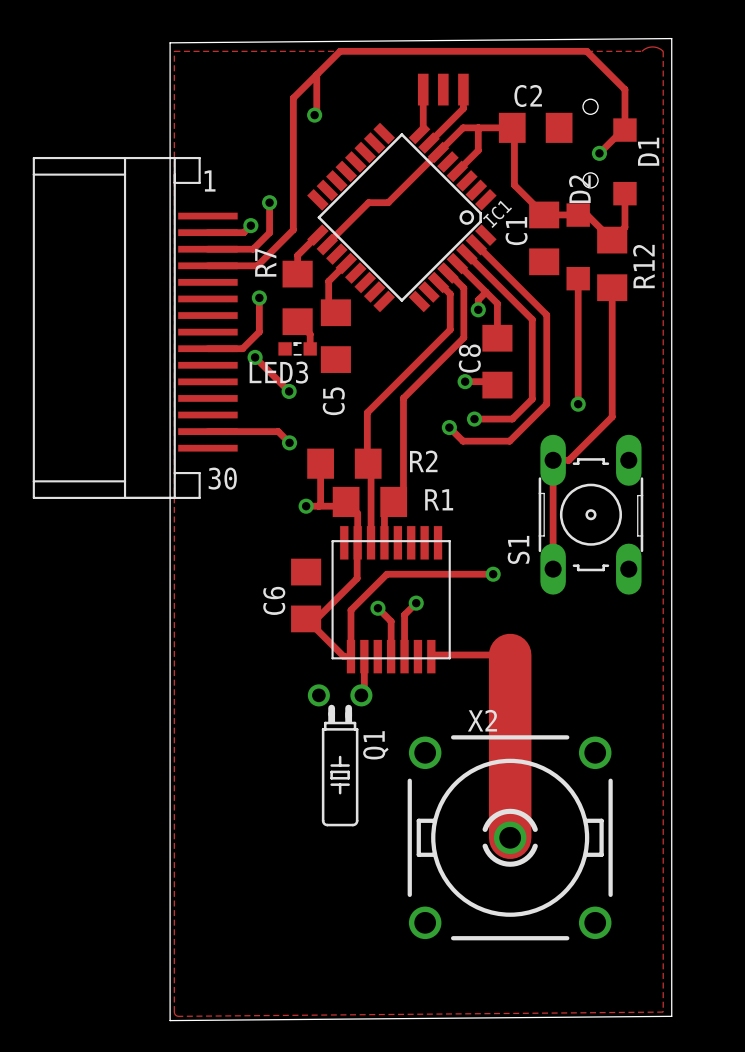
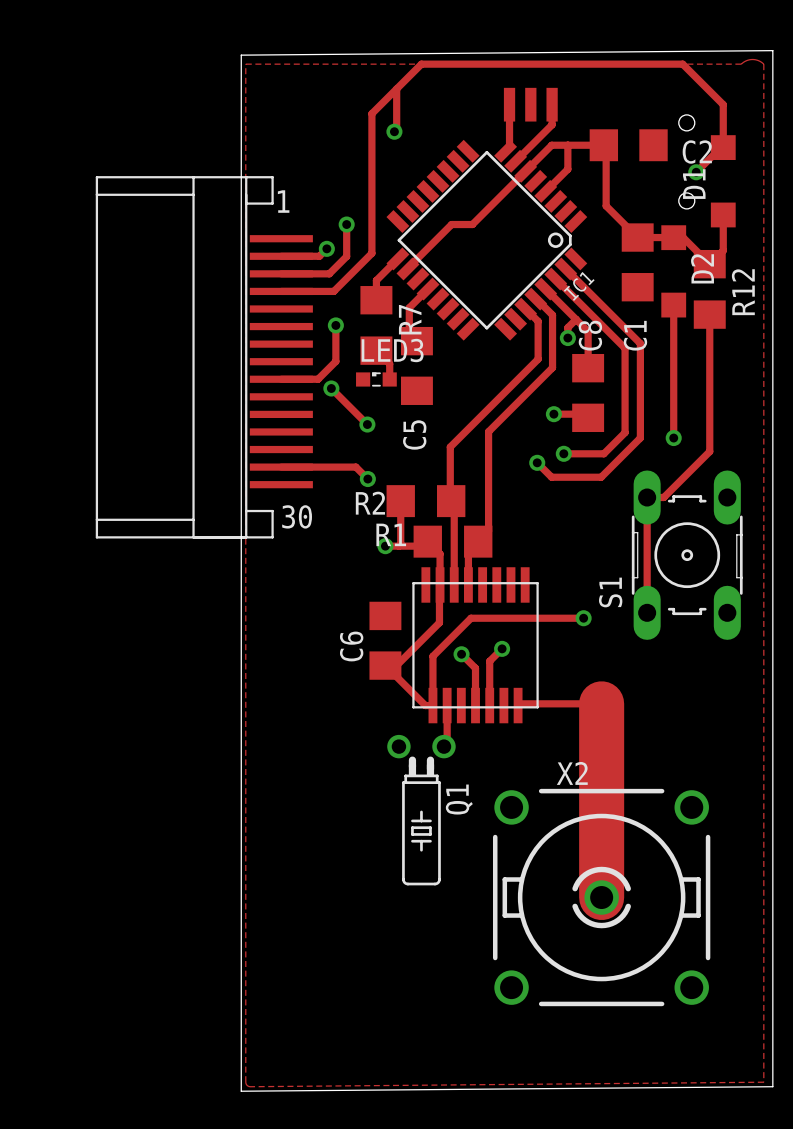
C2 name position: C2 (528, 95) -> C2 (697, 152)
D1 name position: D1 (648, 151) -> D1 (694, 184)
D2 name position: D2 (579, 189) -> D2 (702, 268)
IC1 name position: IC1 (497, 214) -> IC1 (579, 286)
C1 name position: C1 (516, 231) -> C1 (635, 335)
R7 name position: R7 (265, 262) -> R7 (410, 319)
C8 name position: C8 (469, 358) -> C8 (590, 335)
LED3 name position: LED3 (278, 372) -> LED3 (392, 350)
R2 name position: R2 (423, 461) -> R2 (370, 503)
R1 name position: R1 (439, 499) -> R1 (391, 534)

